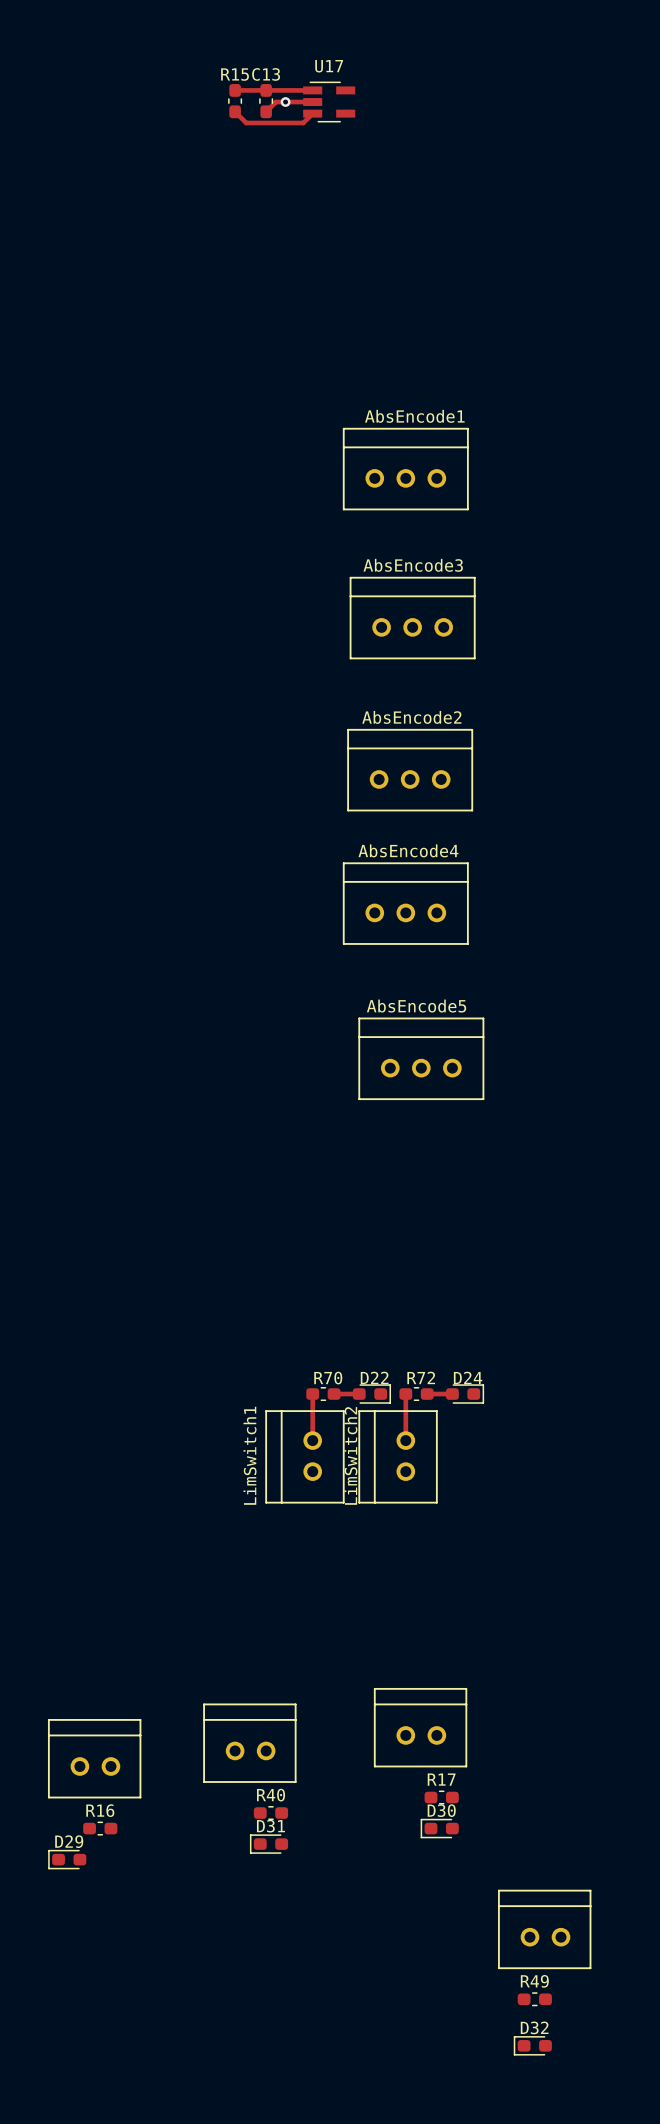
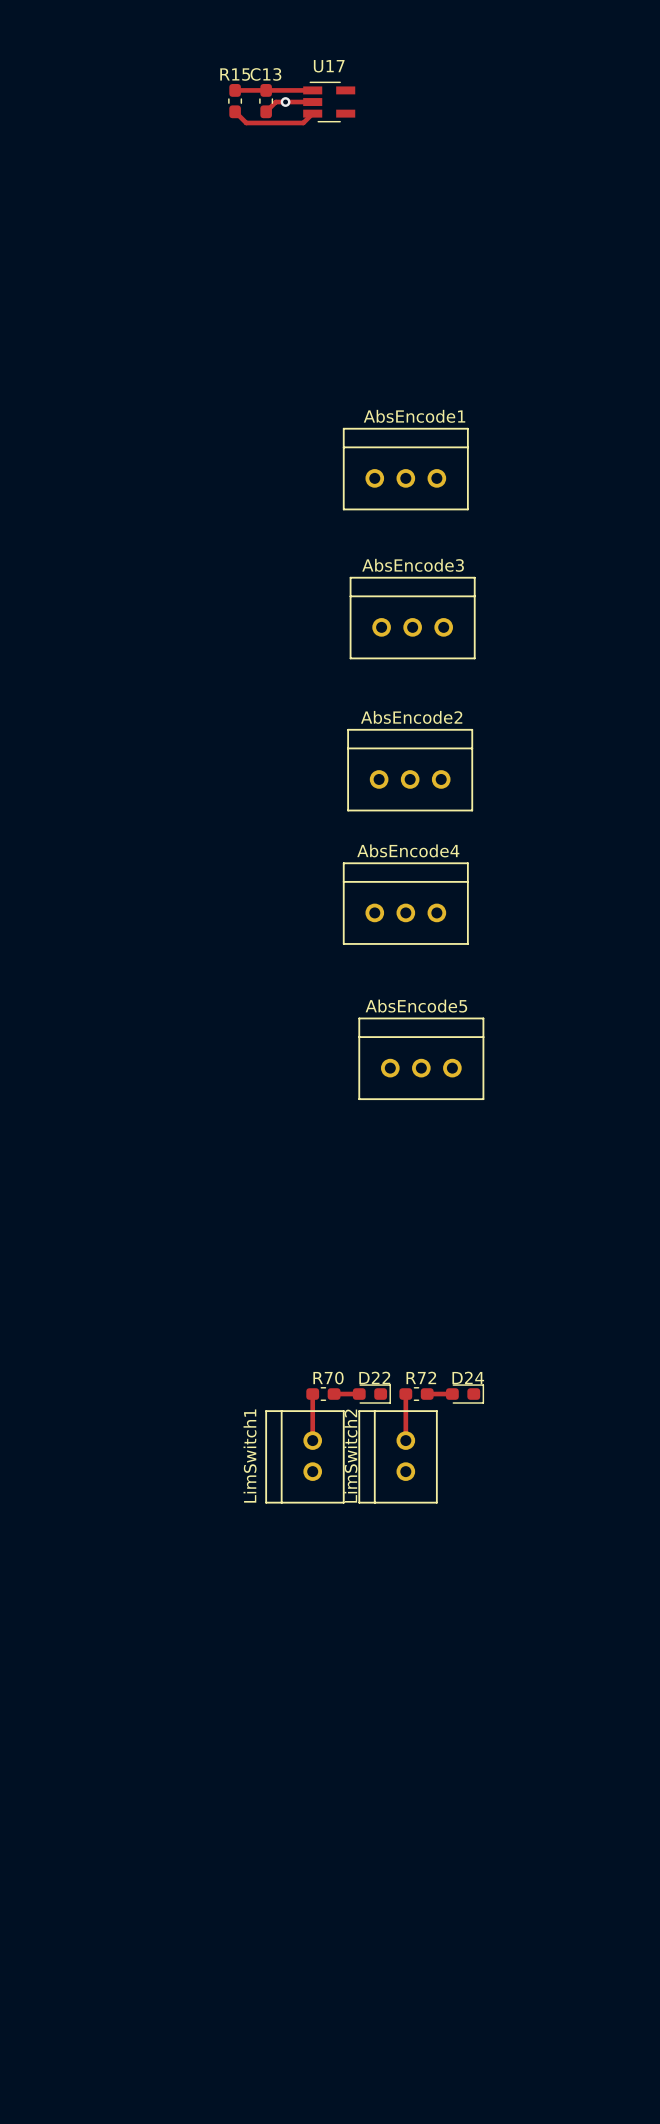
part: (420, 1727) -> none
part: (249, 1743) -> none
part: (94, 1758) -> none
R17: (441, 1797) -> none
R40: (270, 1813) -> none
R16: (100, 1828) -> none
D30: (439, 1828) -> none
D31: (269, 1844) -> none
D29: (67, 1859) -> none
part: (544, 1929) -> none
R49: (534, 1999) -> none
D32: (532, 2045) -> none

